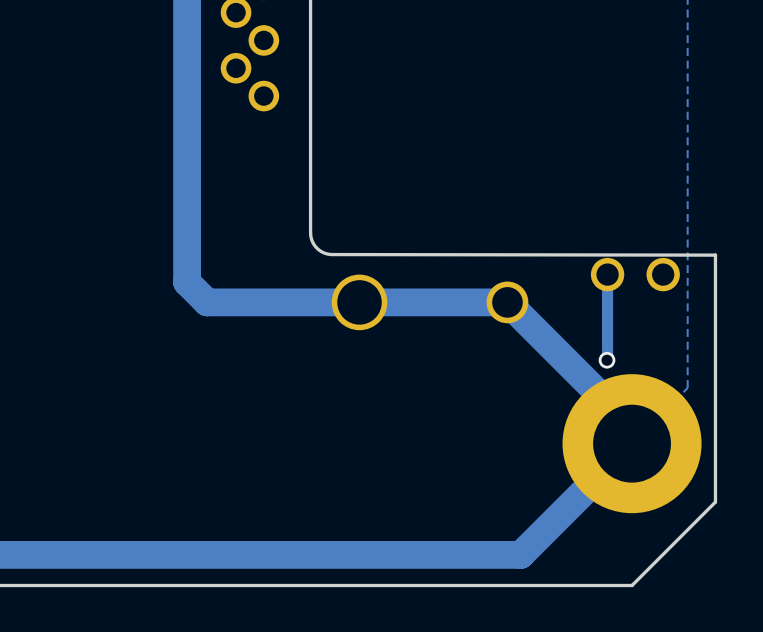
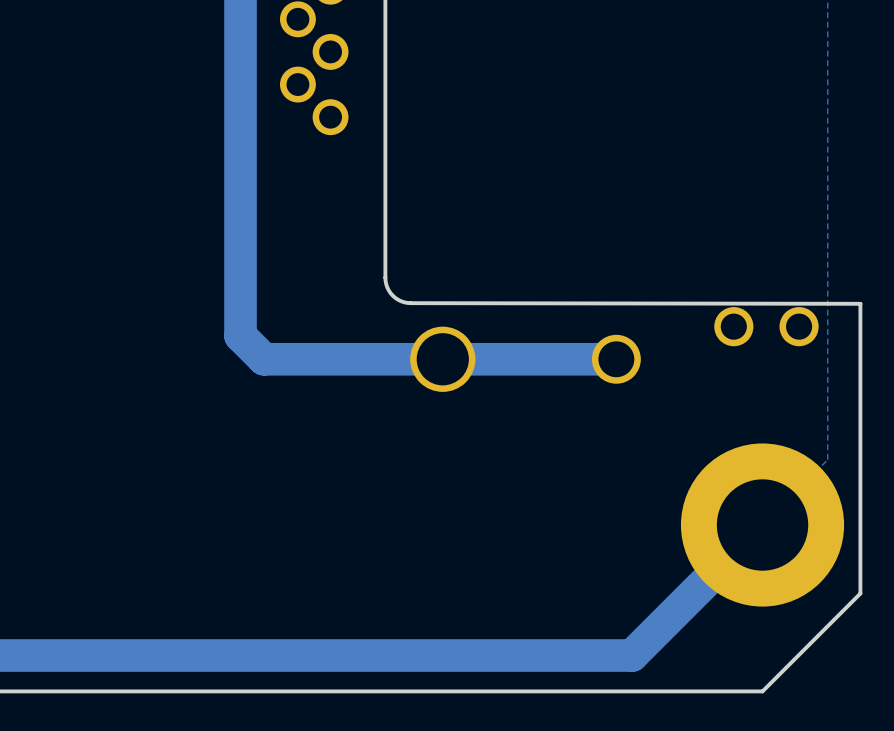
track: (607, 274) (607, 360) -> none
track: (507, 302) (632, 426) (632, 429) -> none
via: (607, 360) -> none

